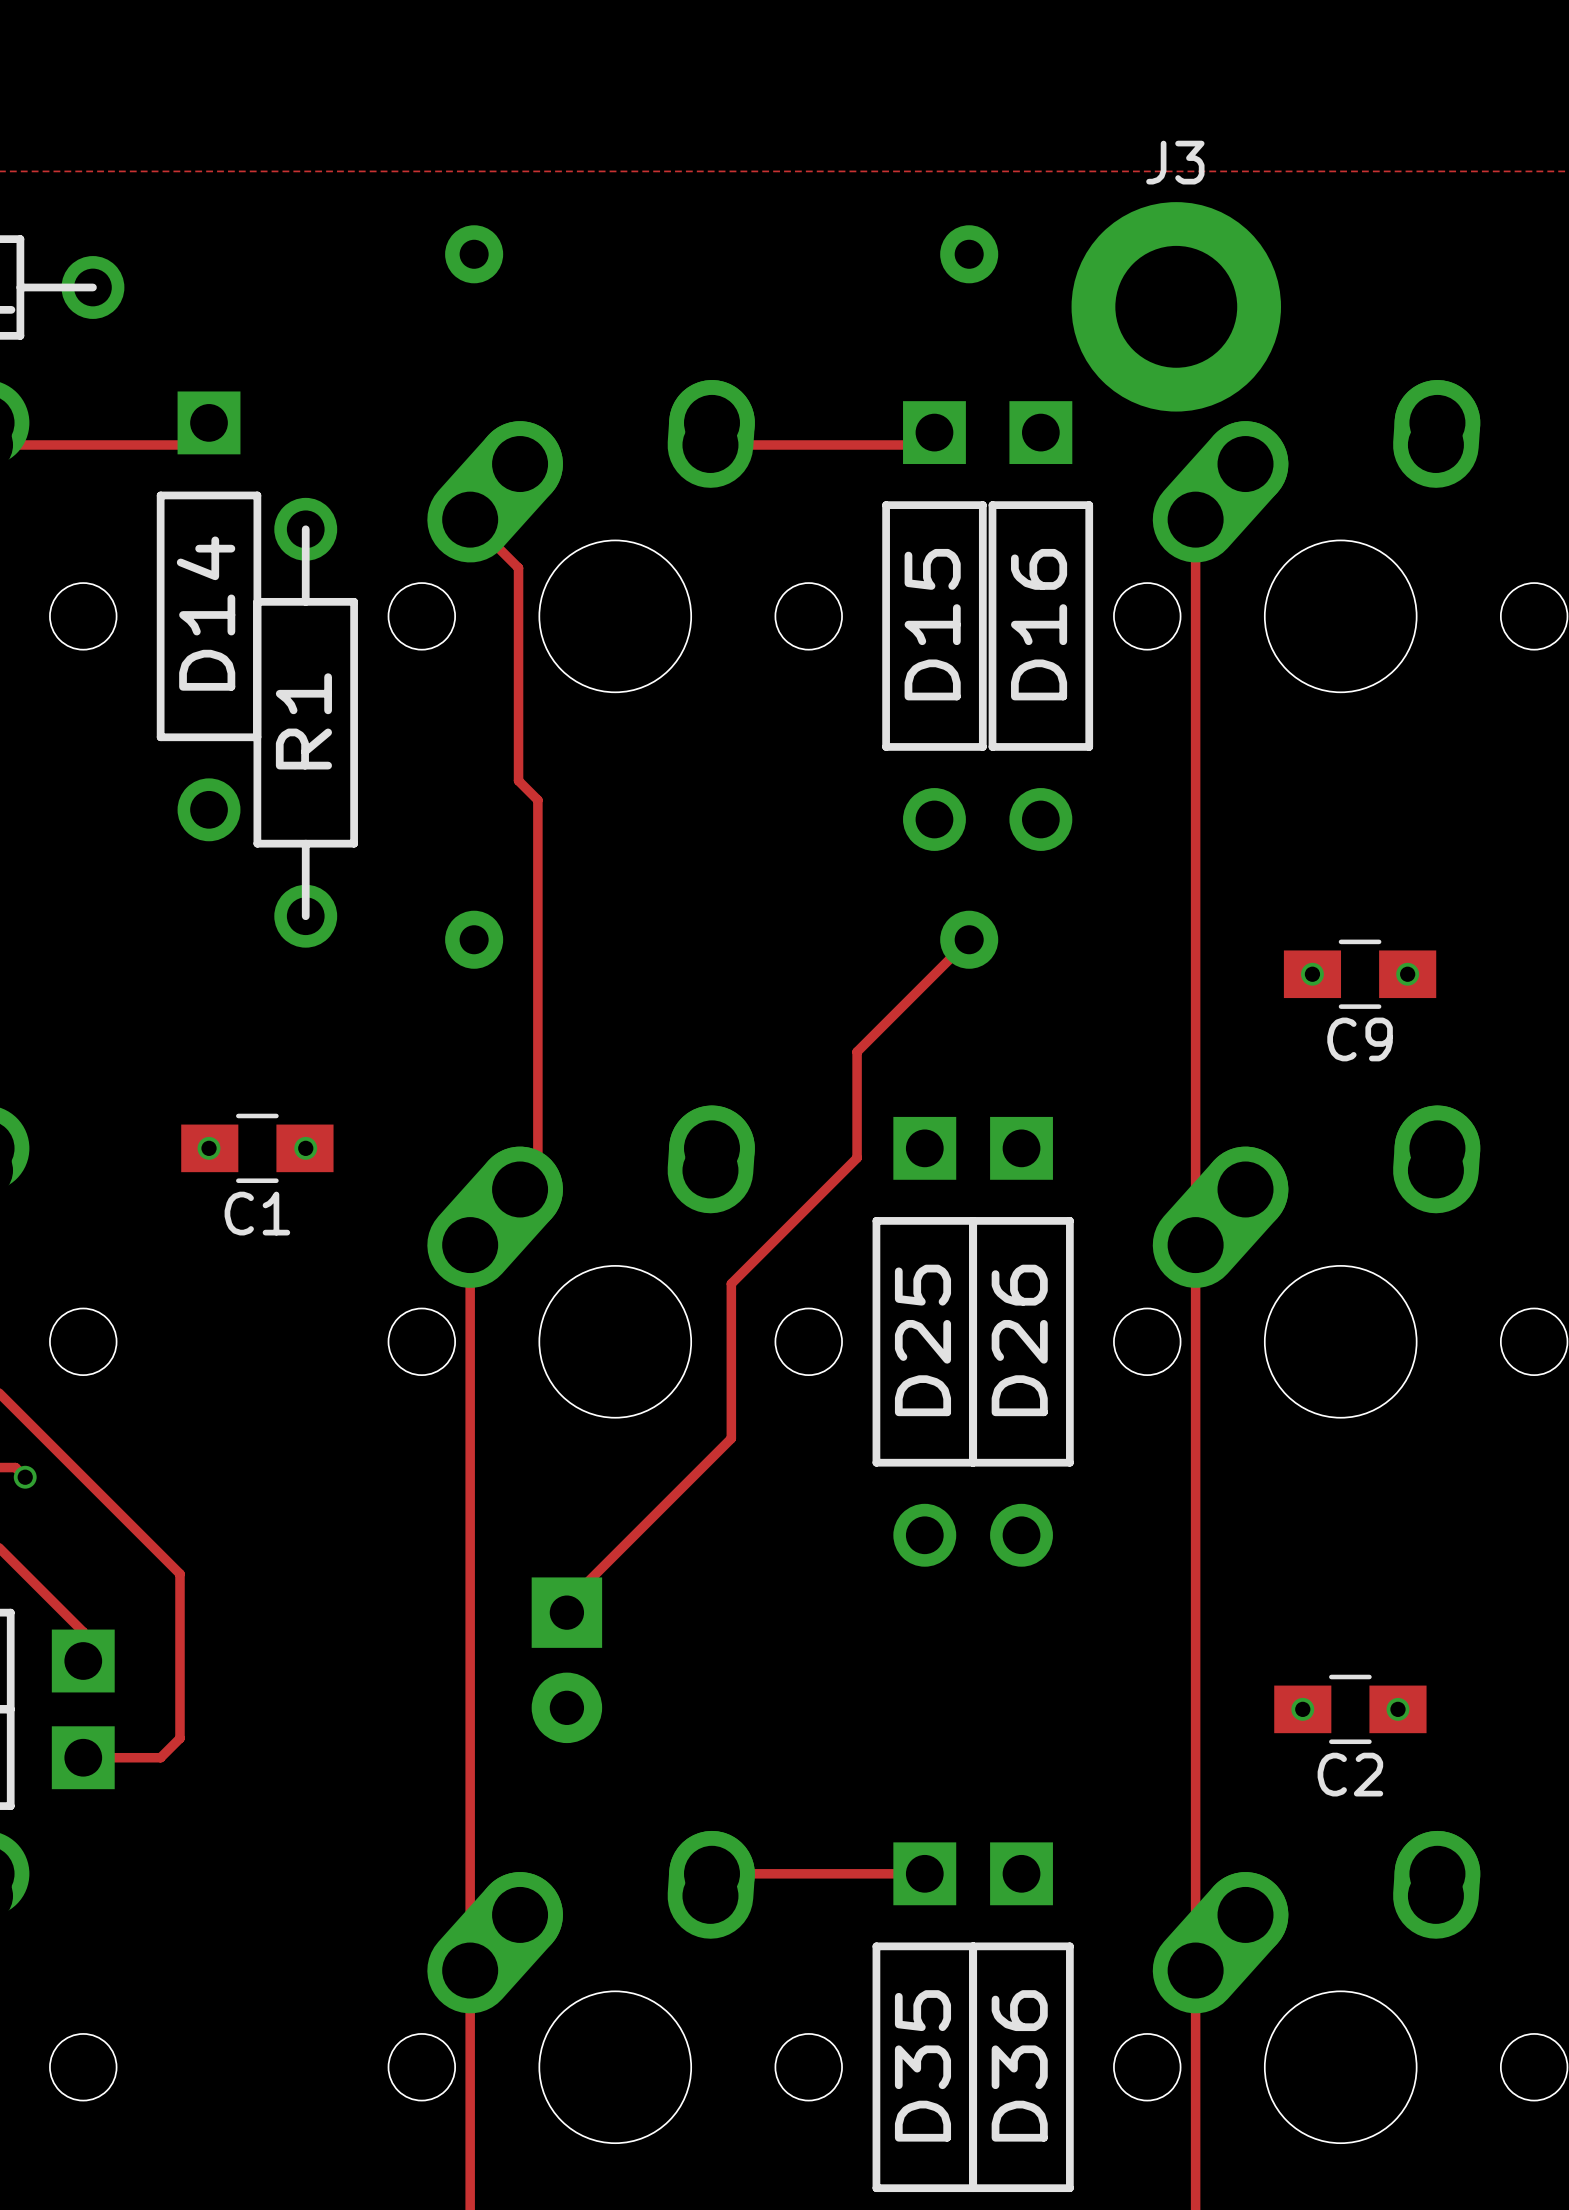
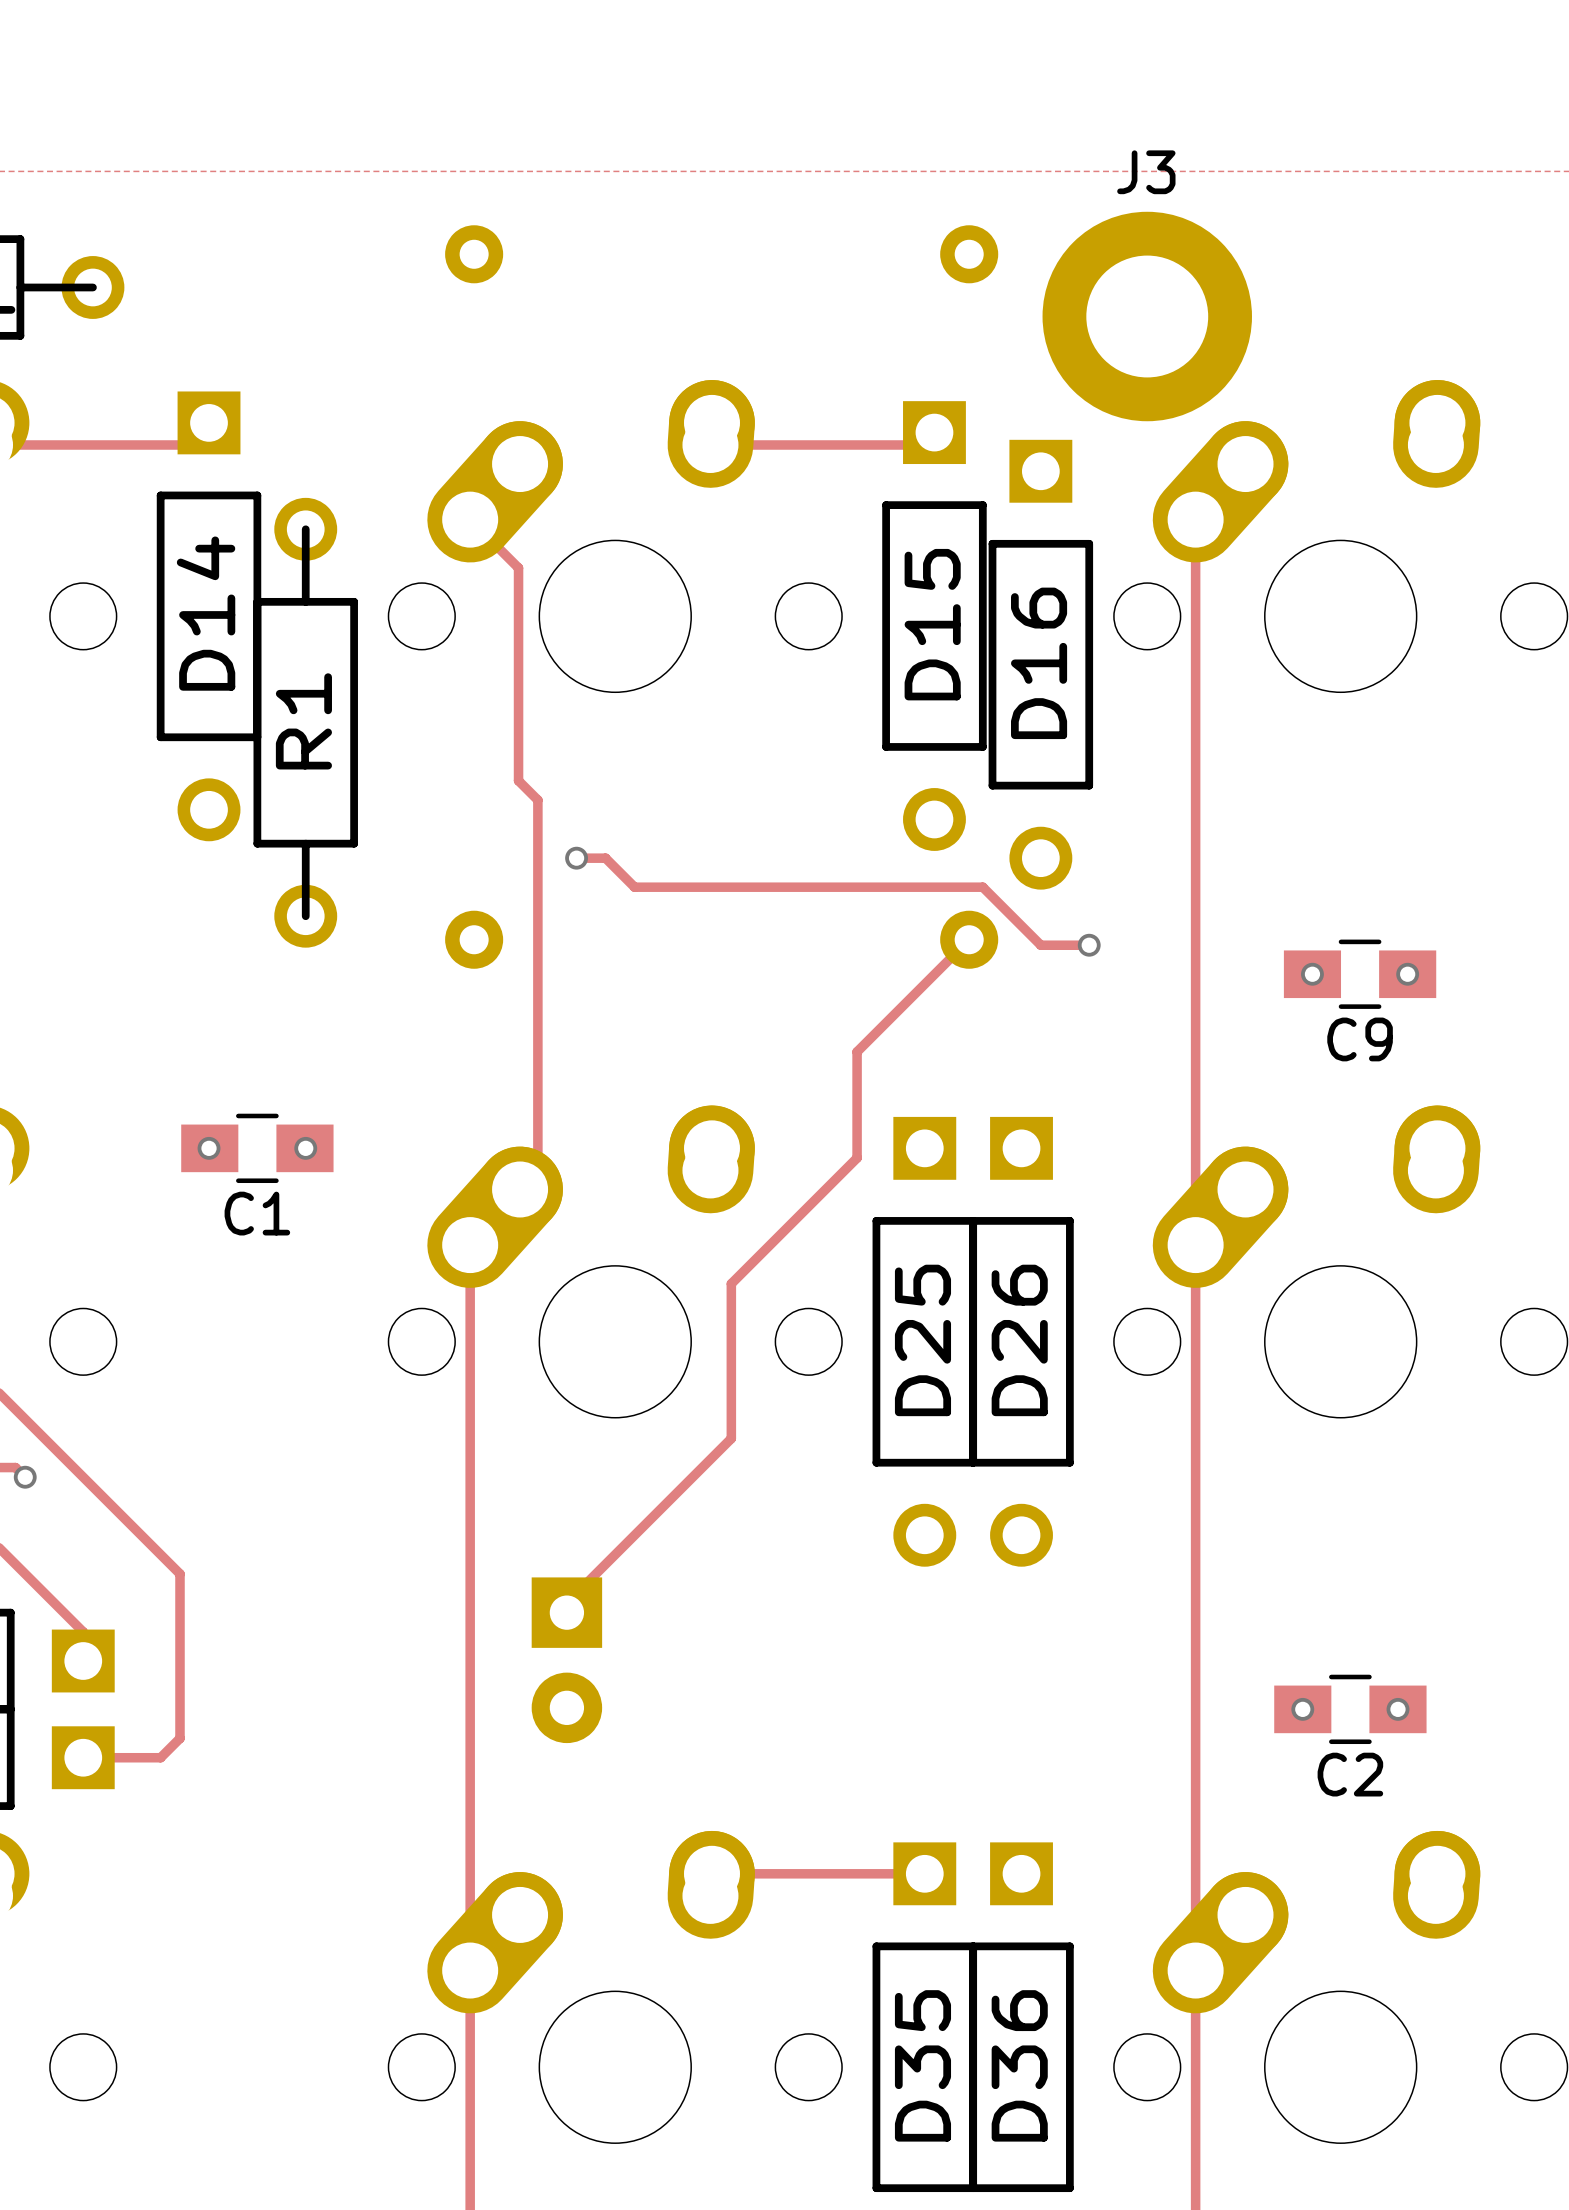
J3 position: (1176, 306) -> (1147, 316)
D16 position: (1040, 626) -> (1040, 664)
track: none -> (576, 858) (605, 858) (634, 887) (982, 887) (1040, 945) (1089, 945)
via: none -> (576, 858)
via: none -> (1089, 945)

